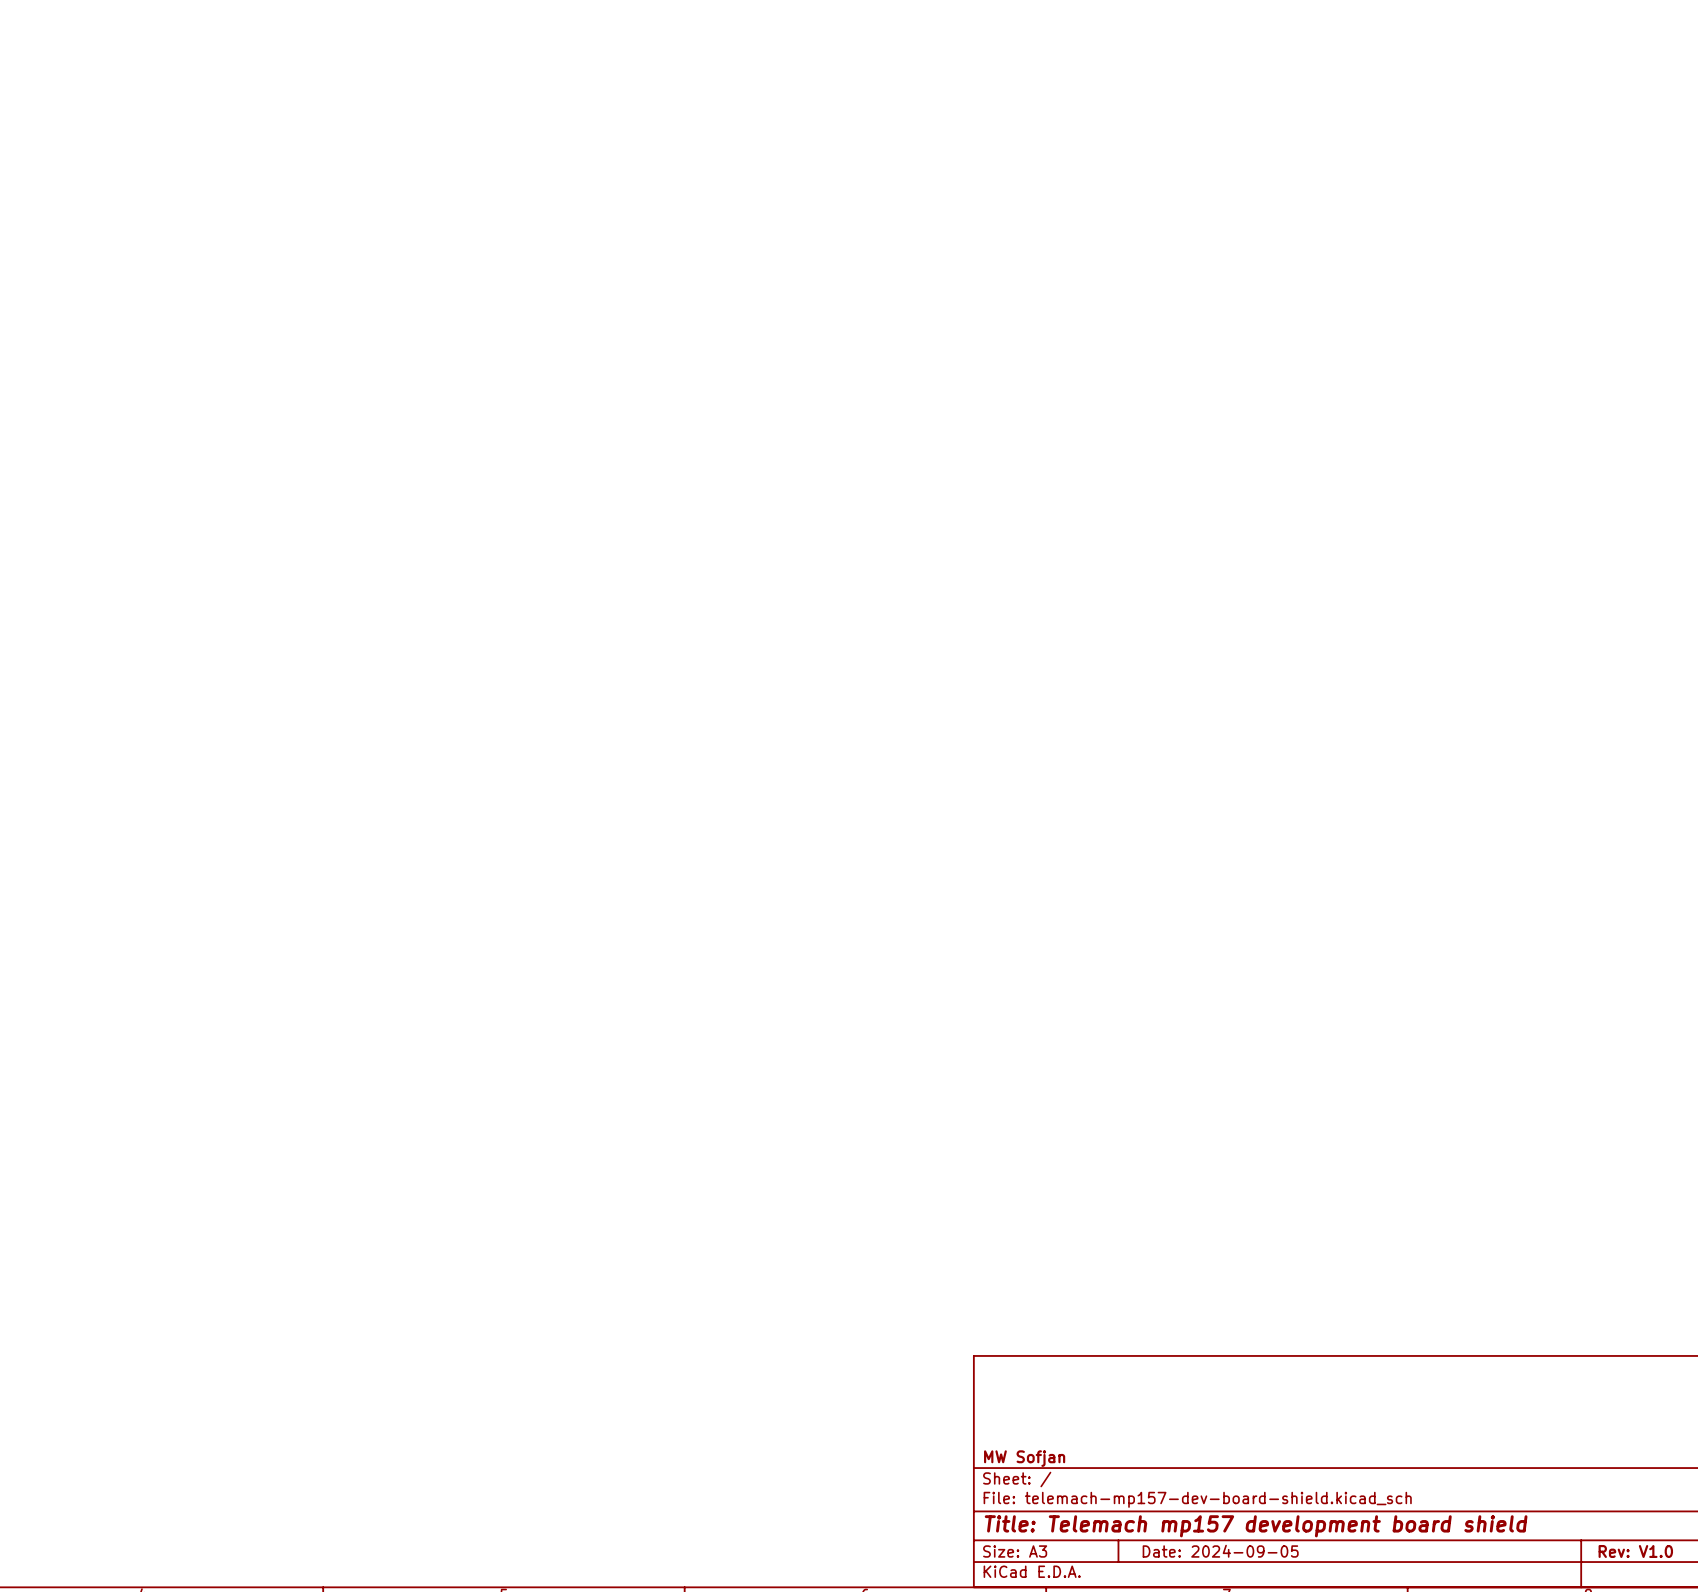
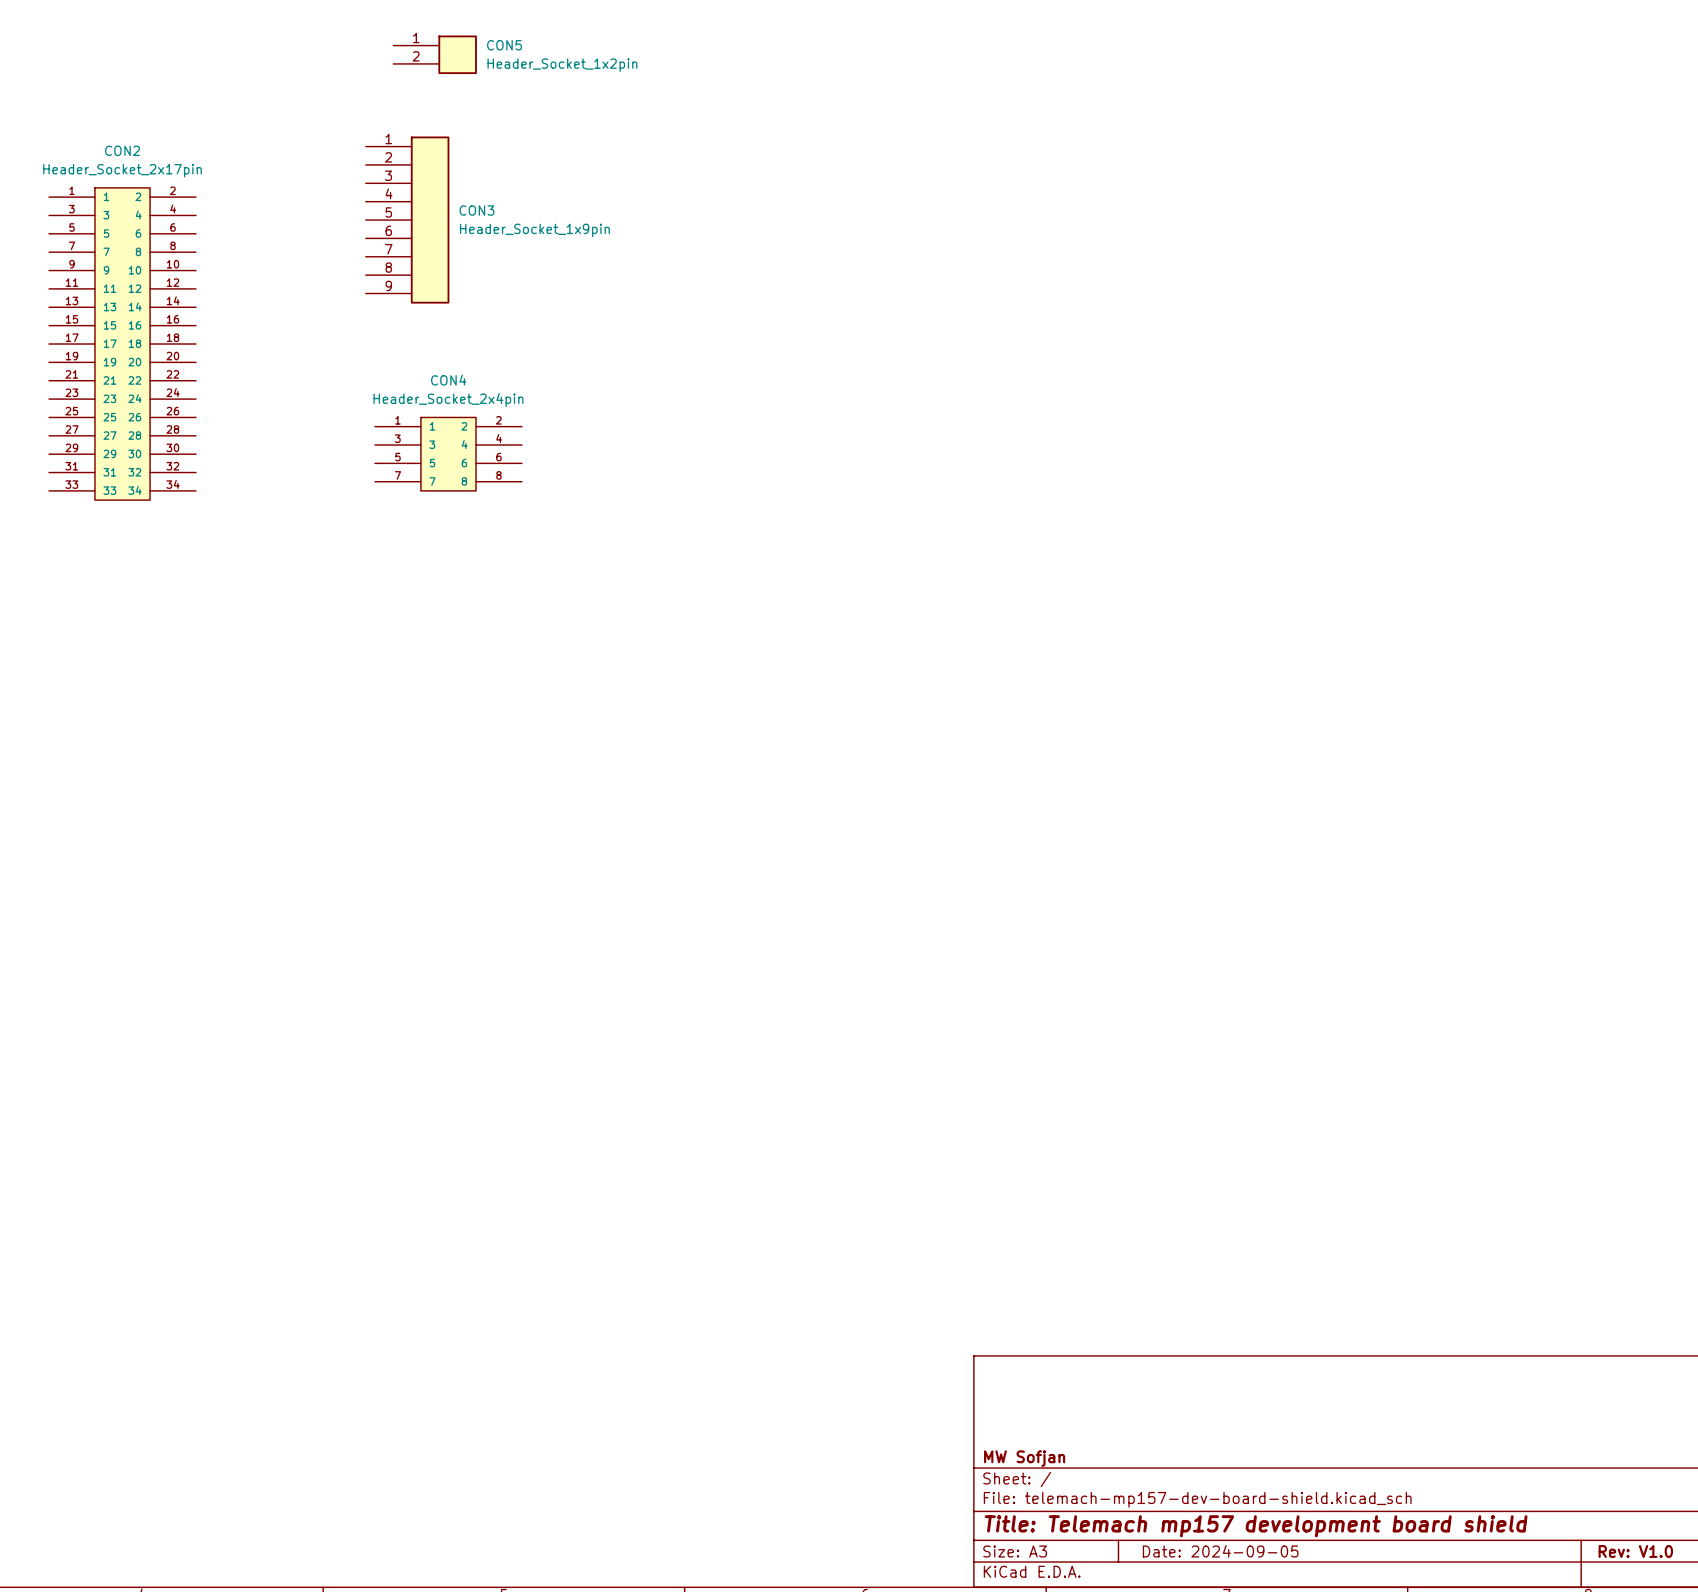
CON5: none -> Header_Socket_1x2pin (435, 54)
CON3: none -> Header_Socket_1x9pin (407, 220)
CON2: none -> Header_Socket_2x17pin (122, 344)
CON4: none -> Header_Socket_2x4pin (448, 454)

